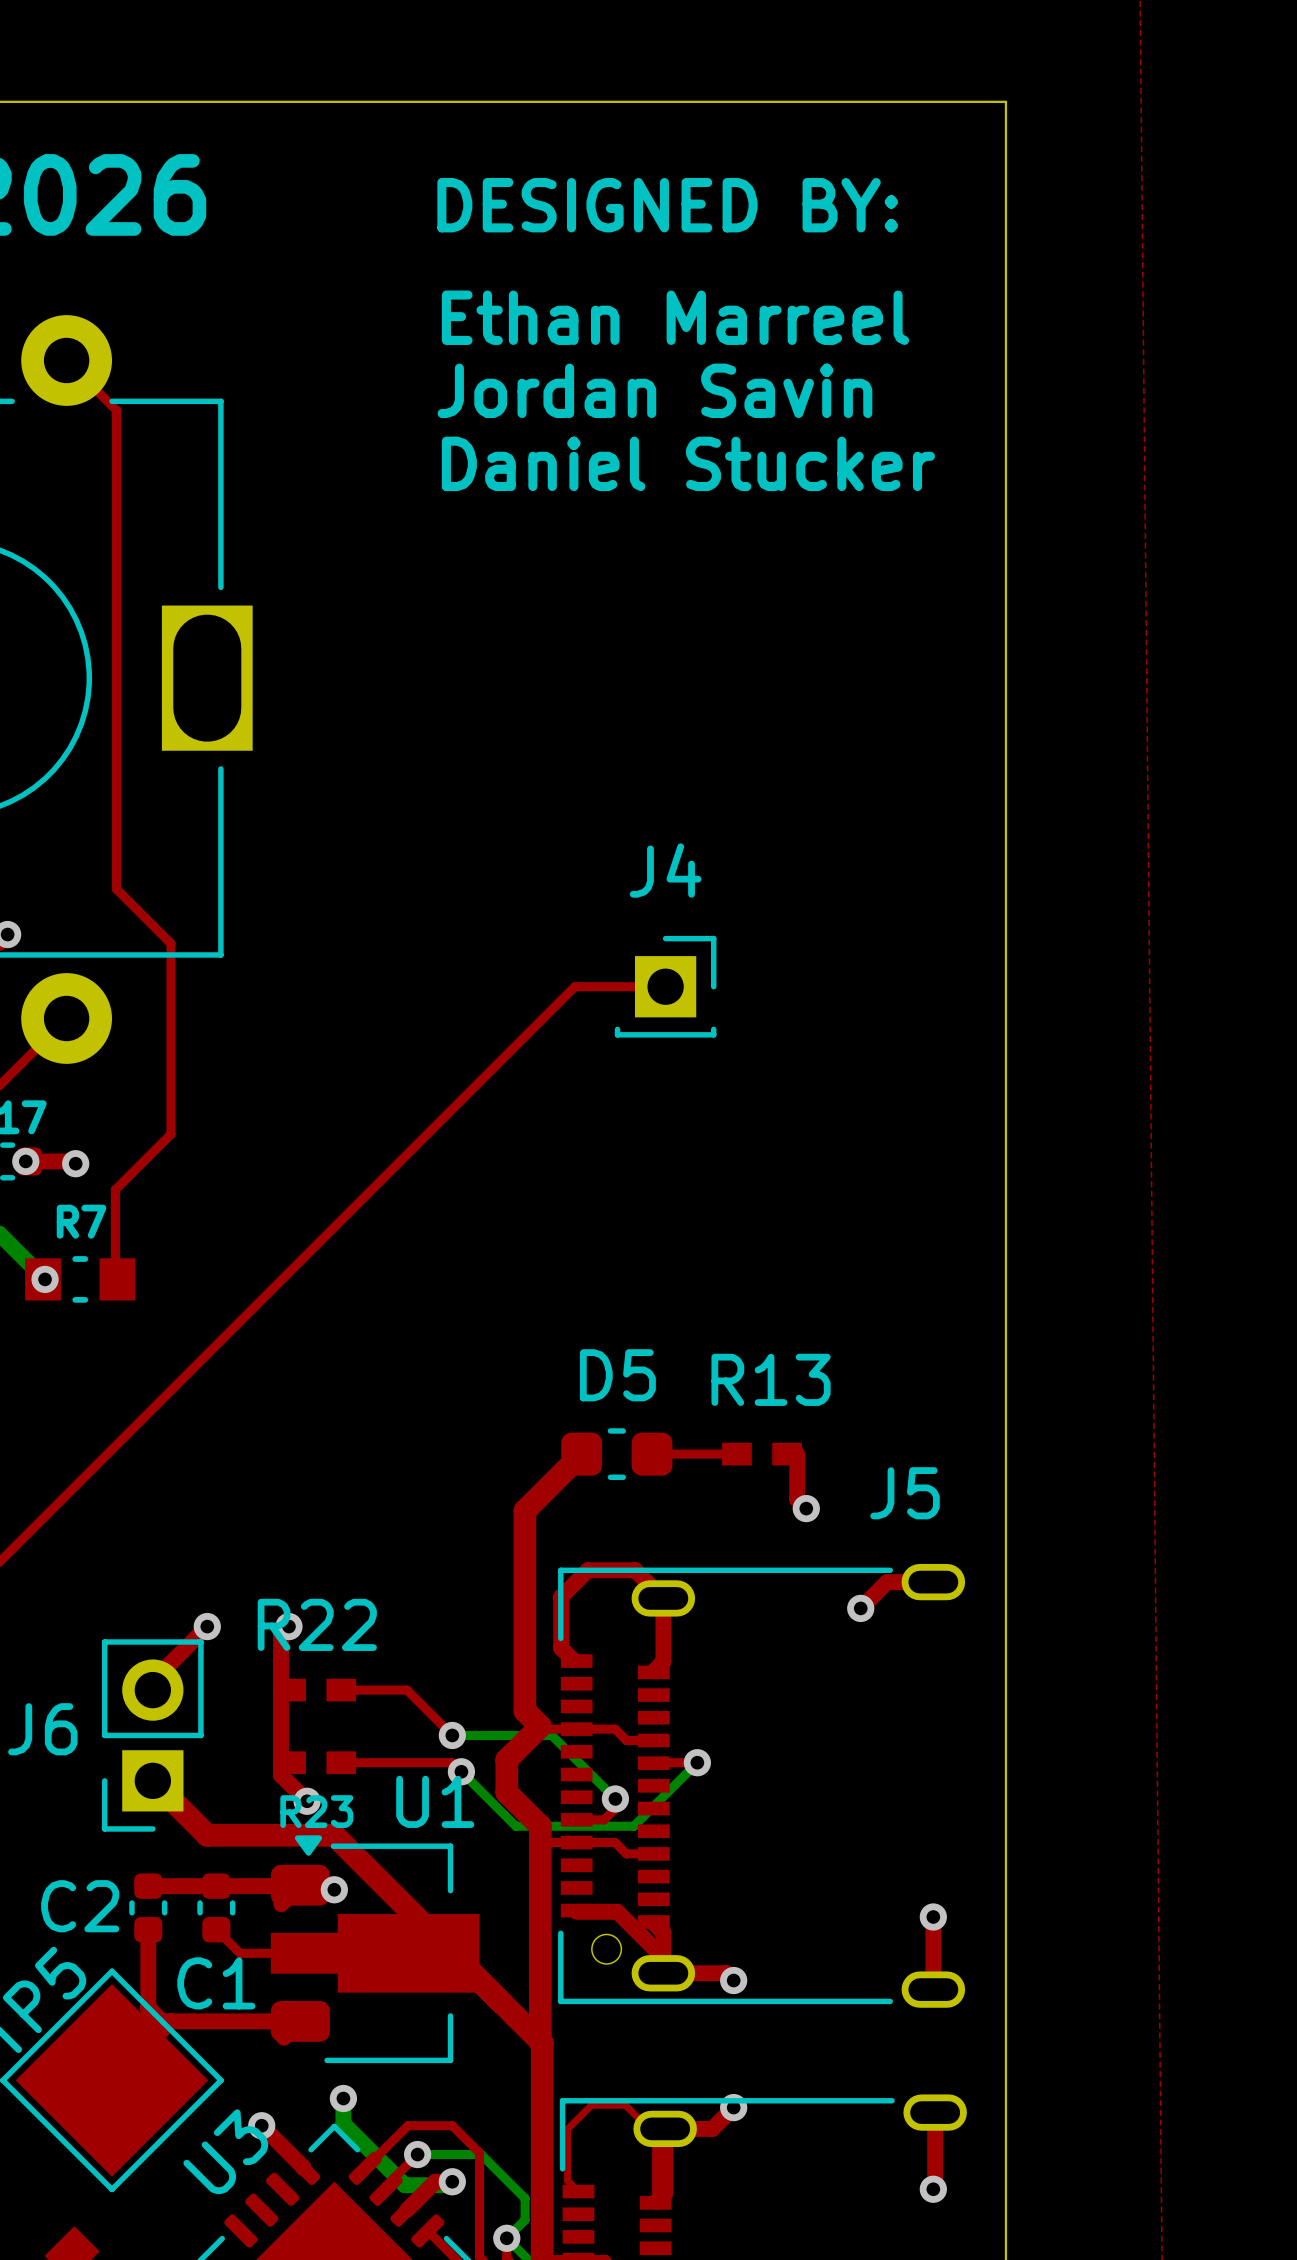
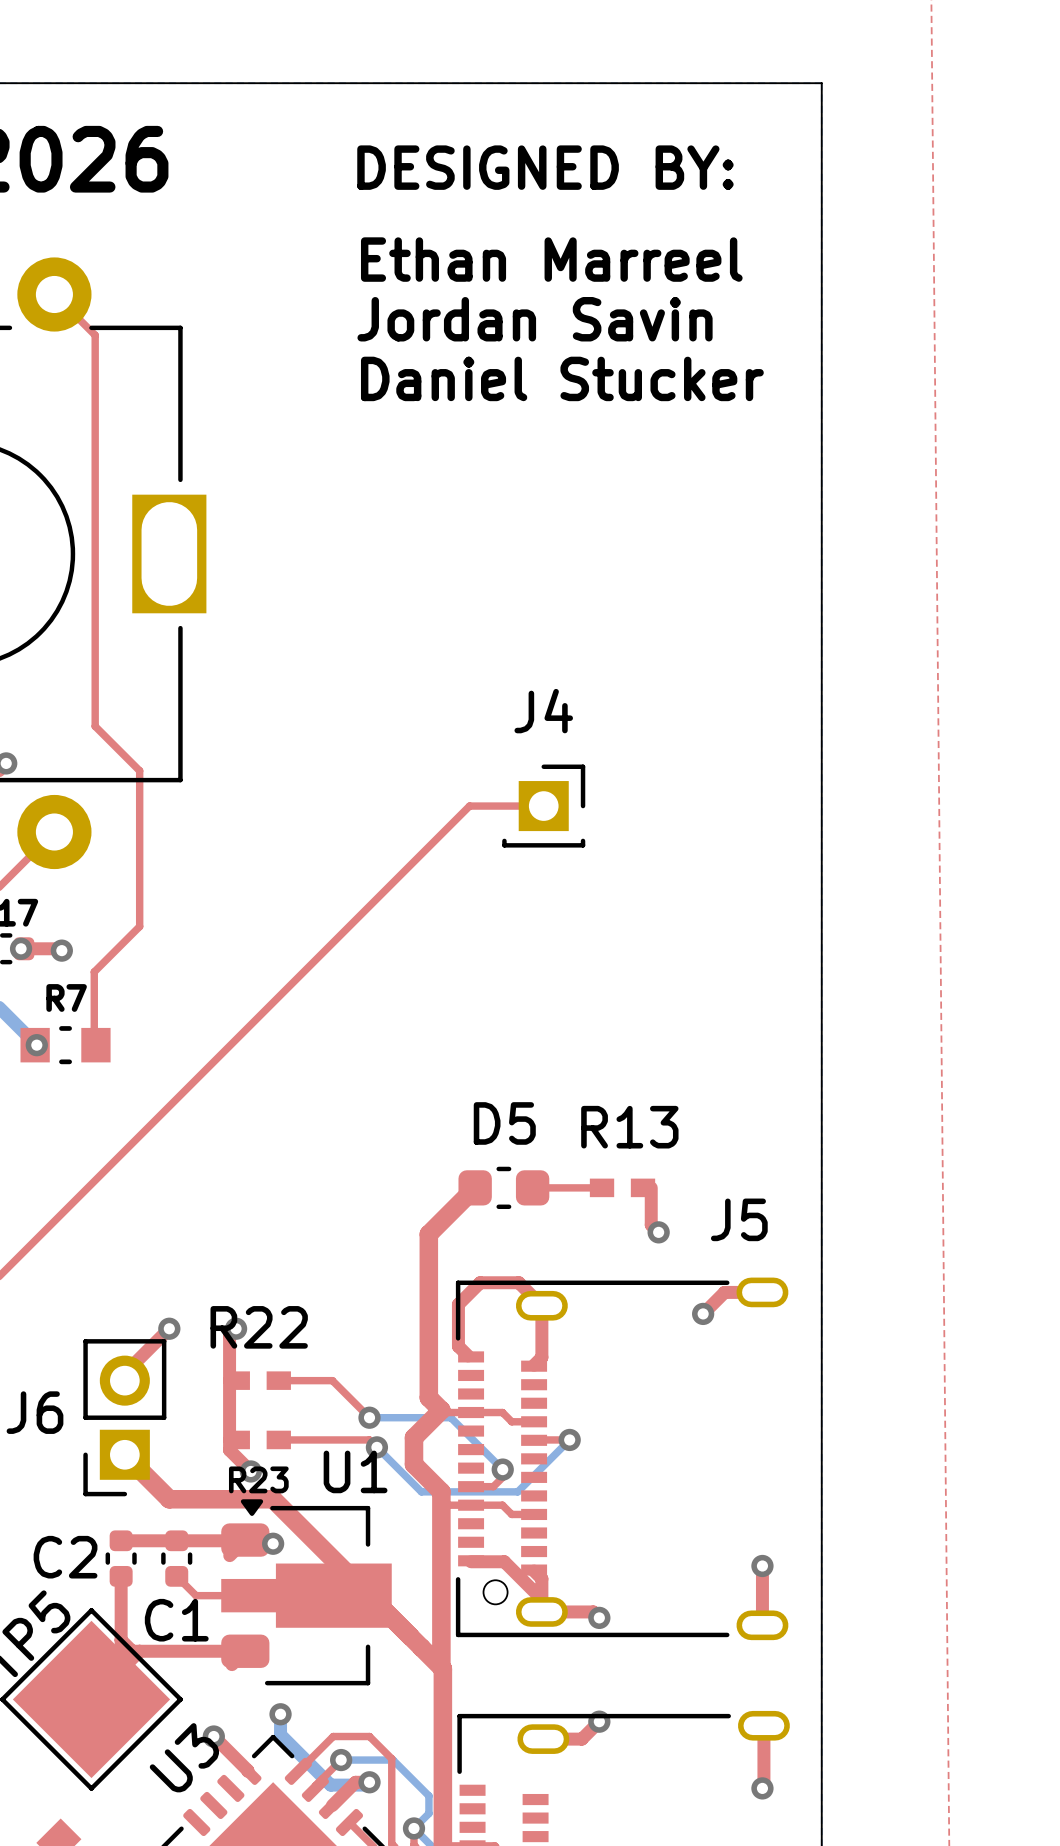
top track: (665, 2128) (665, 2193) (655, 2201) -> none
top track: (578, 2191) (567, 2180) (567, 2129) (591, 2105) (625, 2105) (655, 2135) (655, 2202) -> none

